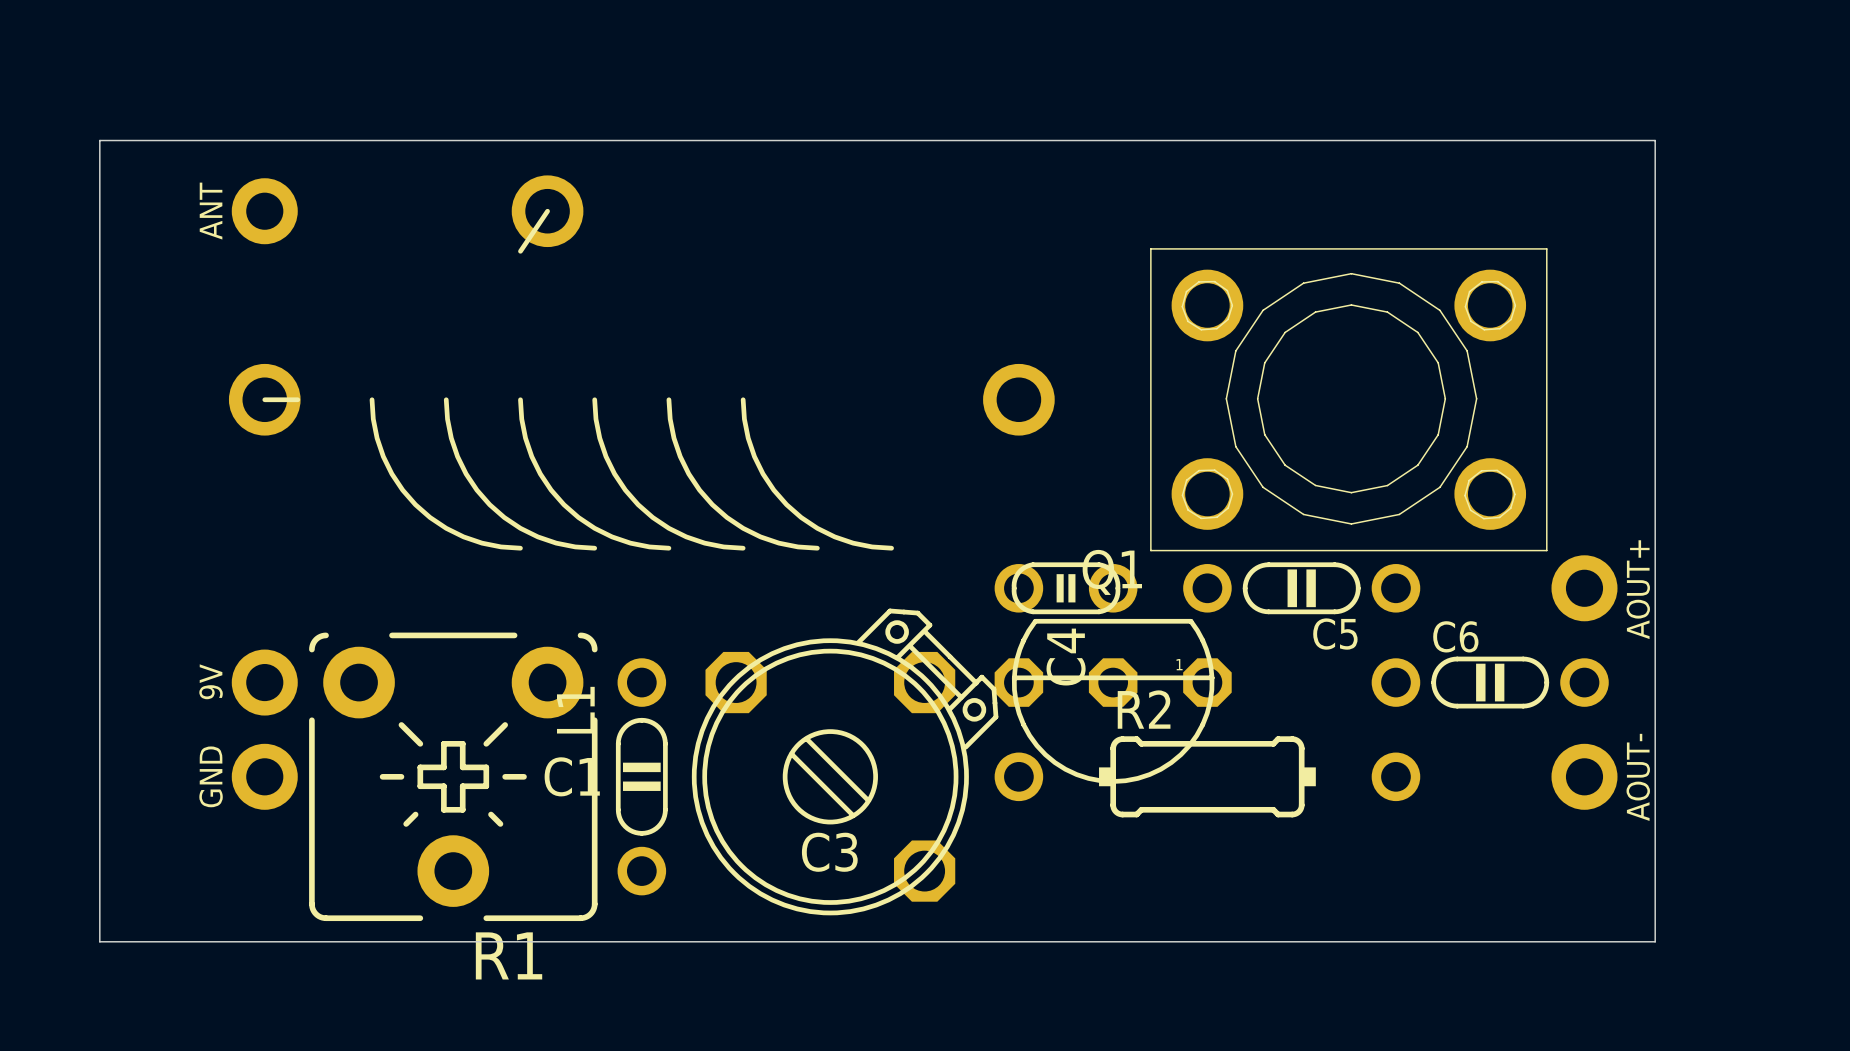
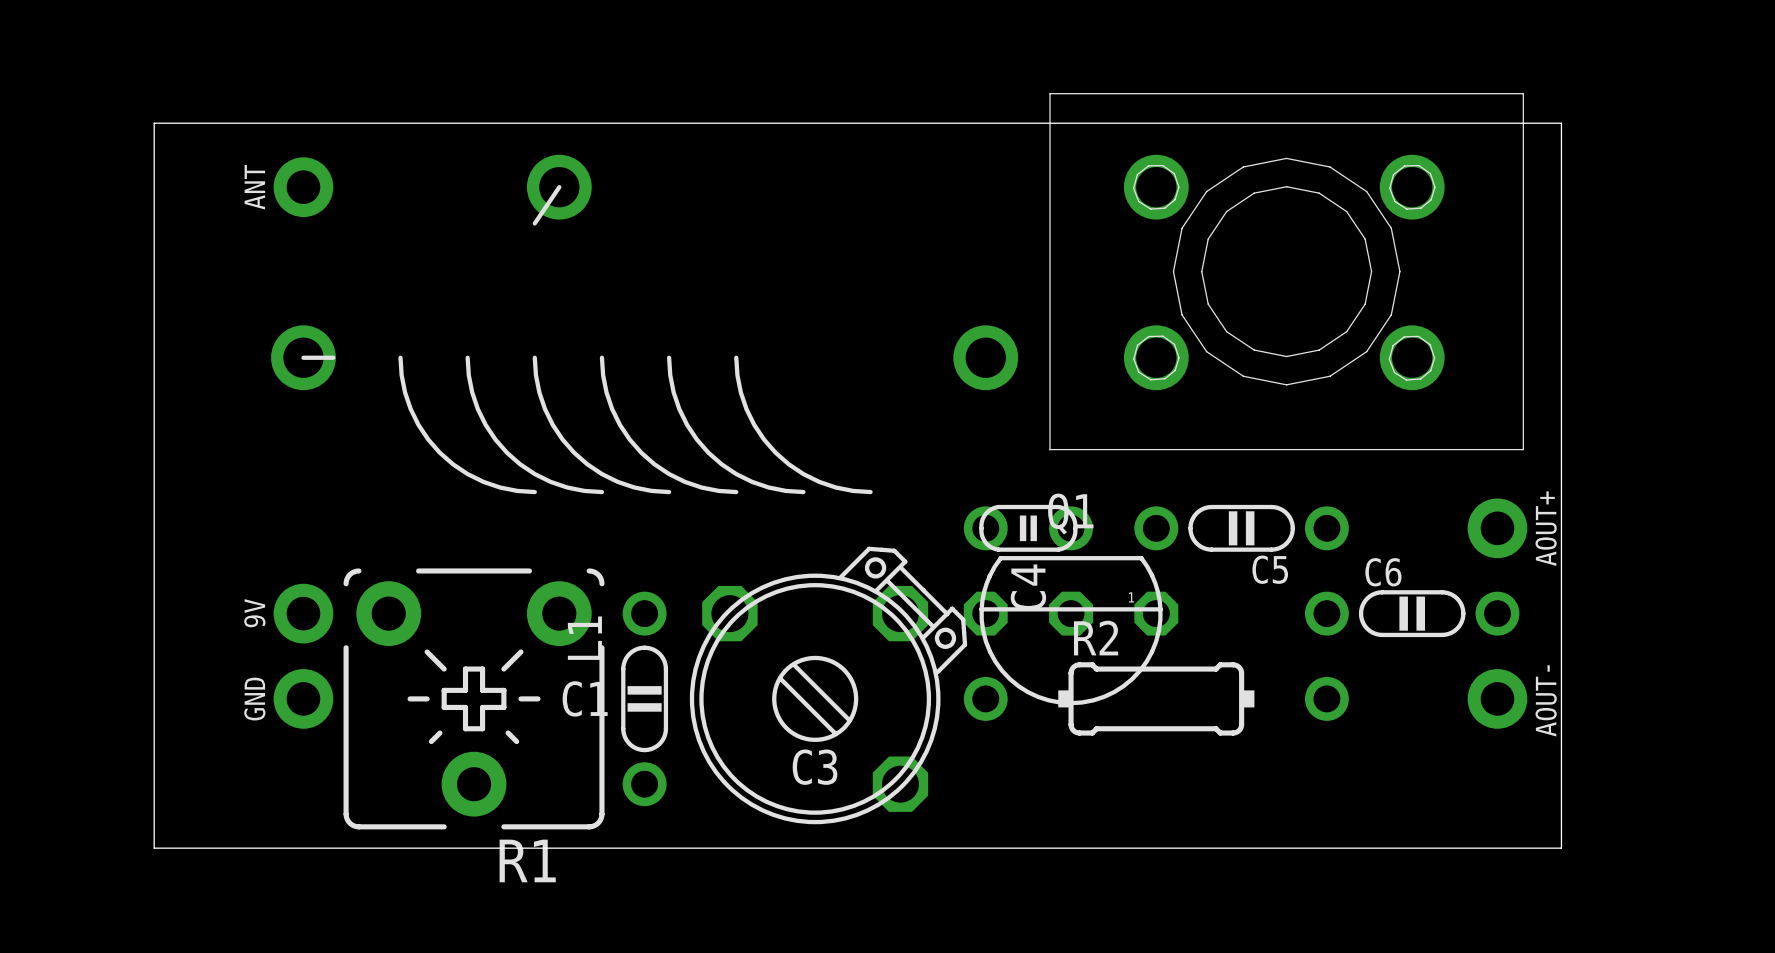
part: none -> (1286, 271)
part: (1348, 399) -> none

